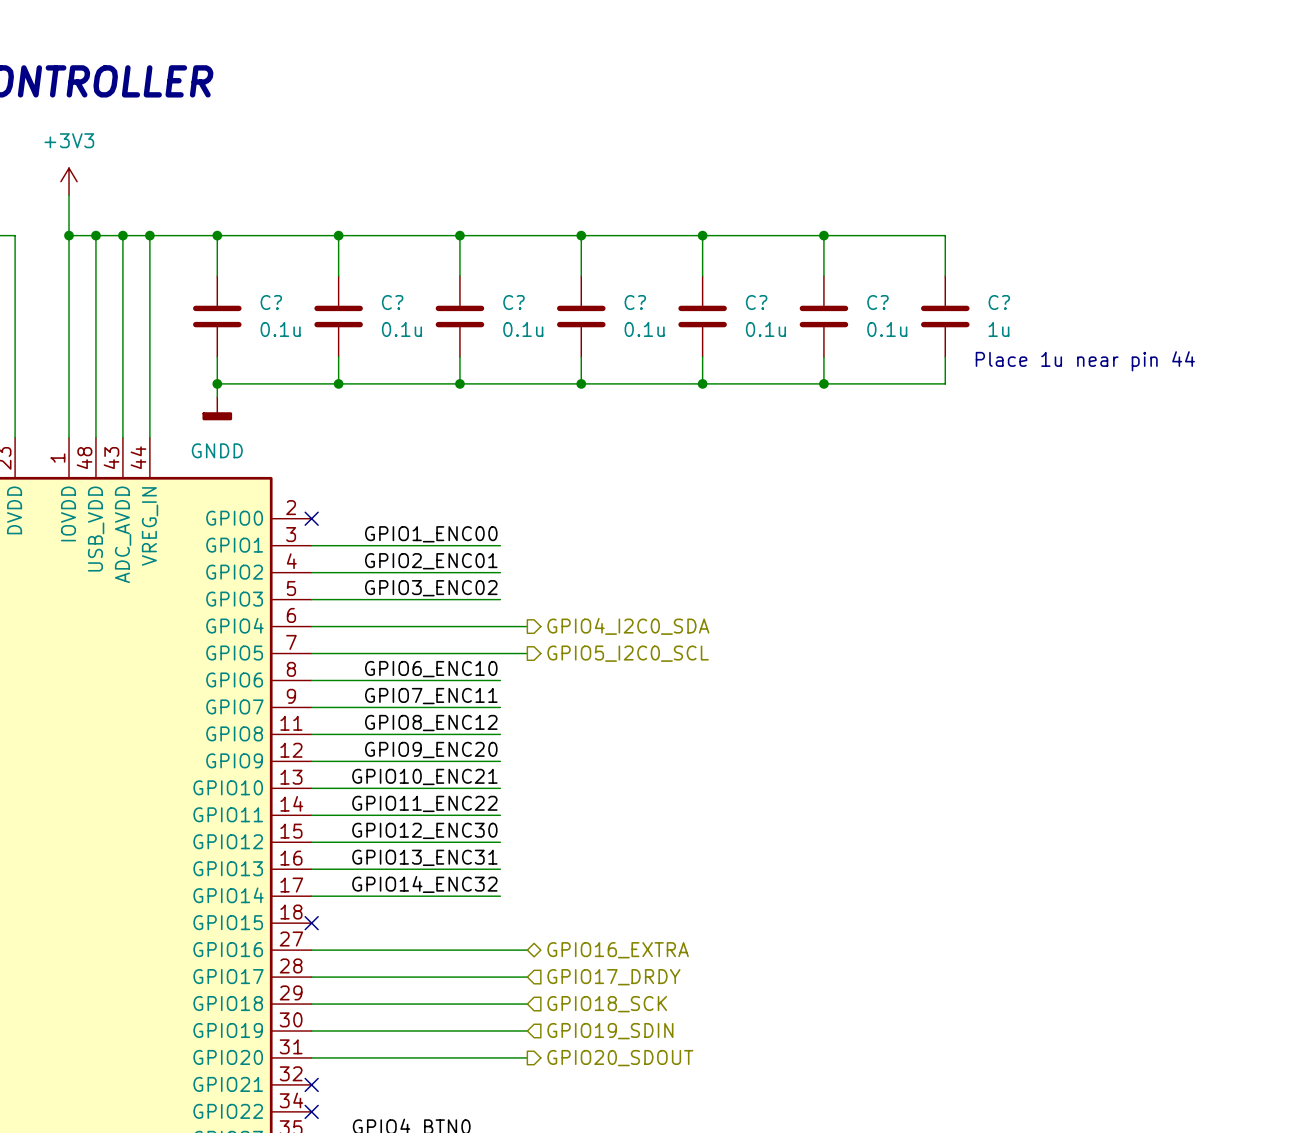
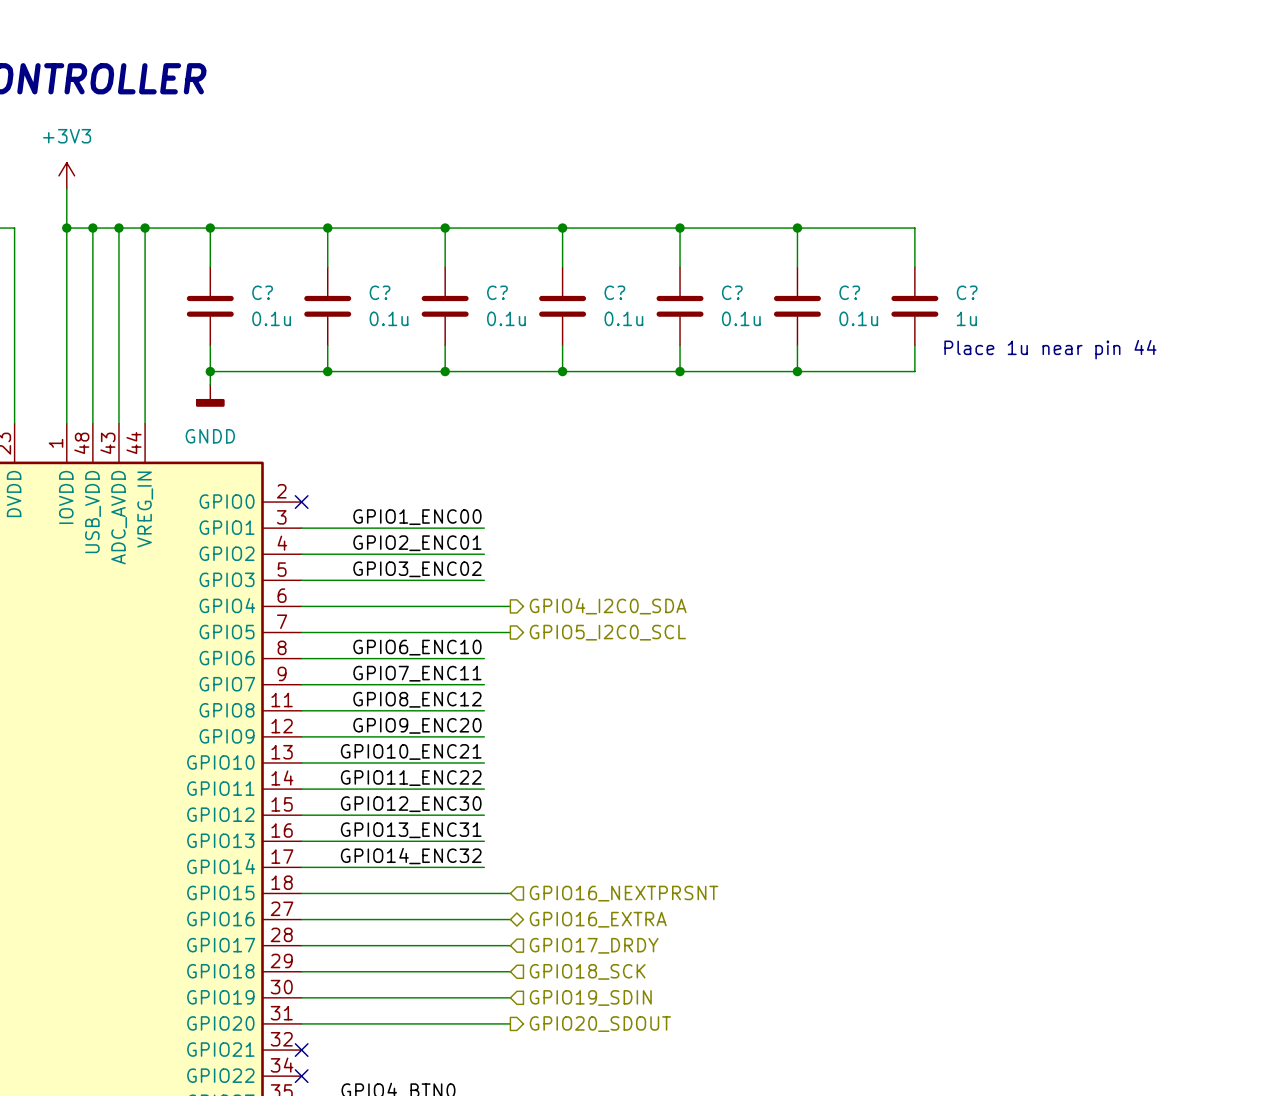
wire: none -> (301, 893) (510, 893)
no-connect mark: (311, 923) -> none
hierarchical label: none -> GPIO16_NEXTPRSNT (623, 893)

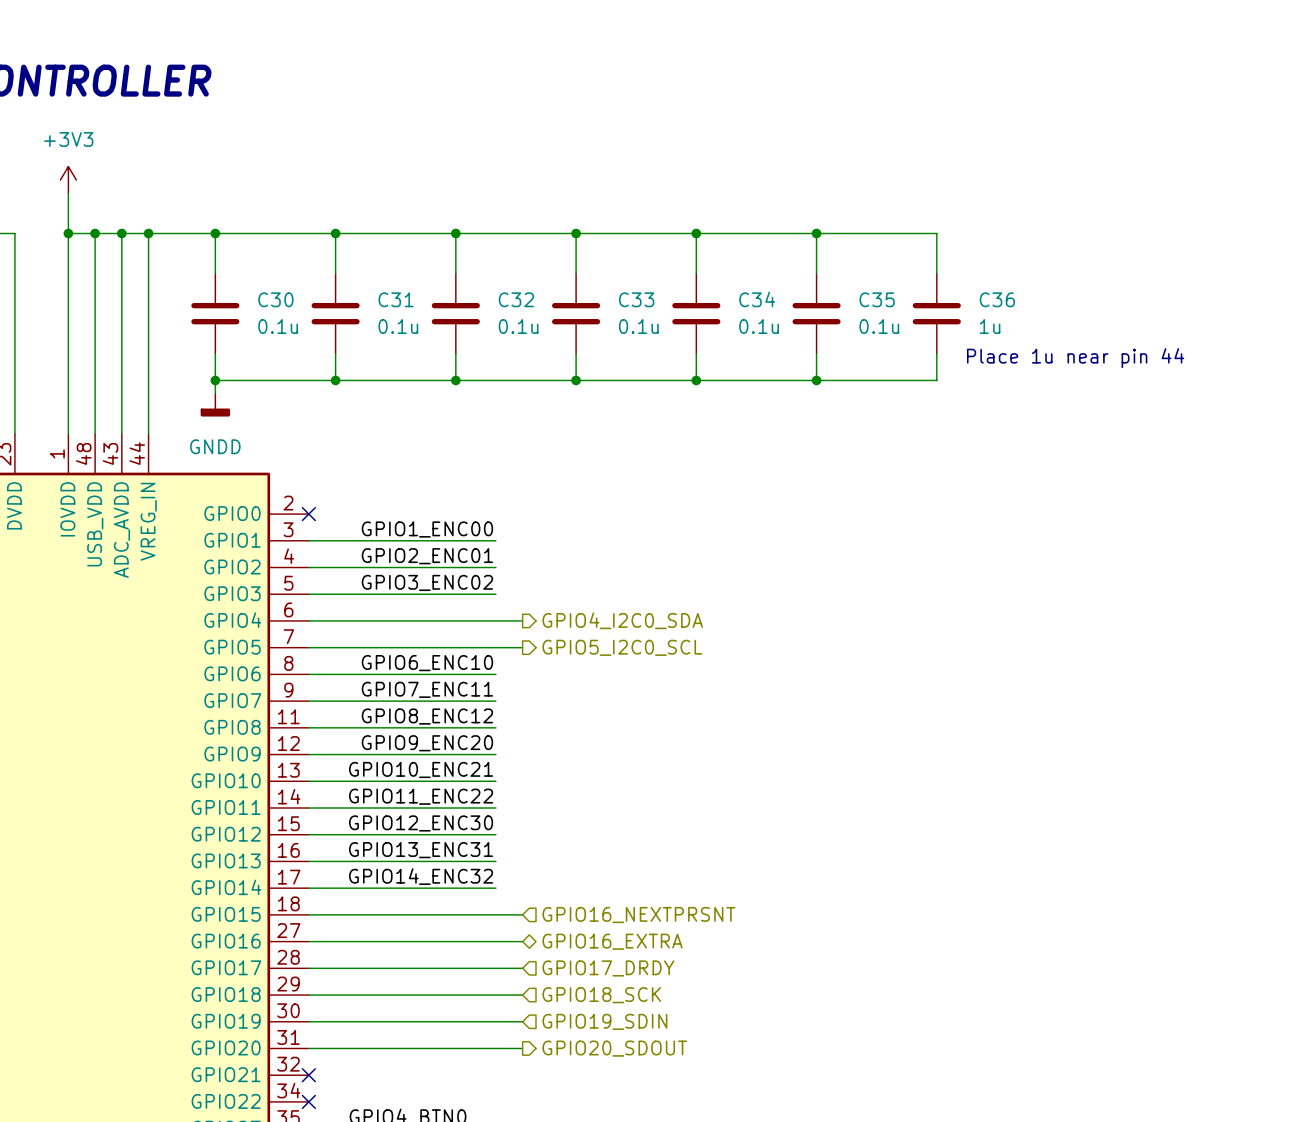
C? name: C? (262, 292) -> C30 (275, 299)
C? name: C? (380, 292) -> C31 (396, 299)
C? name: C? (497, 292) -> C32 (516, 299)
C? name: C? (614, 292) -> C33 (636, 299)
C? name: C? (732, 292) -> C34 (757, 299)
C? name: C? (849, 292) -> C35 (877, 299)
C? name: C? (967, 292) -> C36 (997, 299)

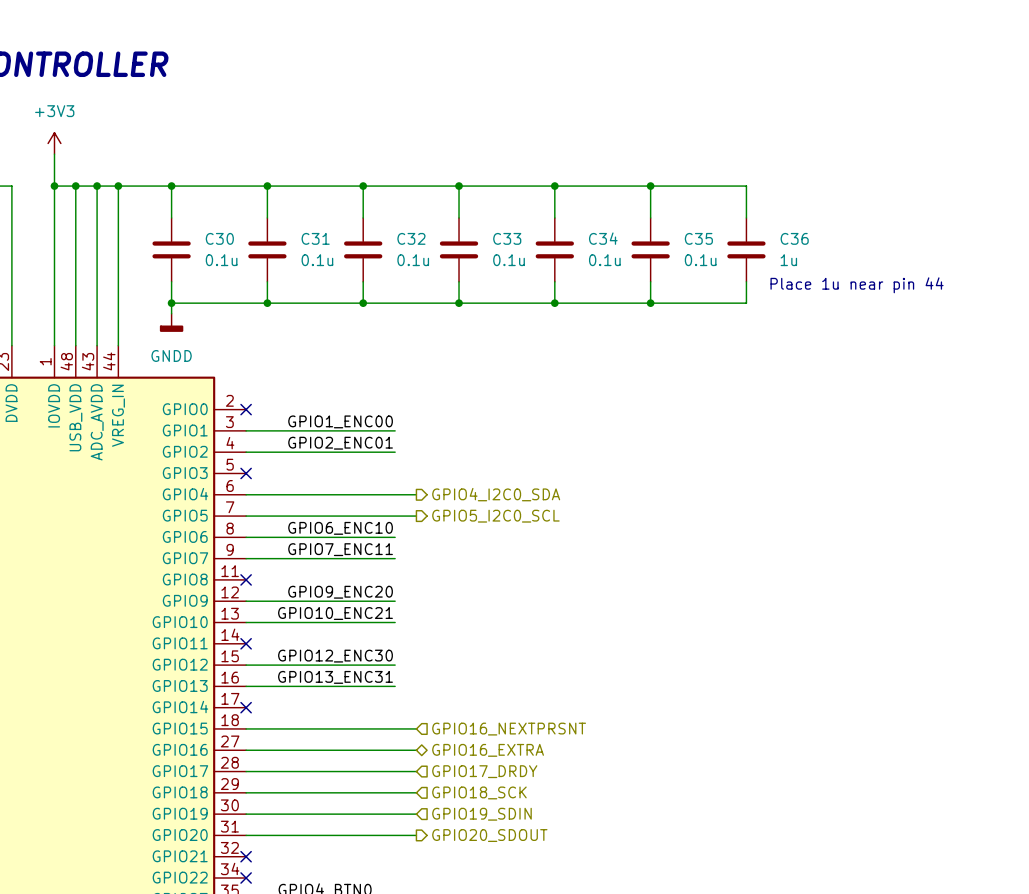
label: GPIO3_ENC02 (427, 582) -> none
wire: (308, 594) (495, 594) -> none
no-connect mark: none -> (246, 473)
label: GPIO8_ENC12 (427, 716) -> none
wire: (308, 727) (495, 727) -> none
no-connect mark: none -> (246, 579)
label: GPIO11_ENC22 (421, 796) -> none
wire: (308, 808) (495, 808) -> none
no-connect mark: none -> (246, 643)
label: GPIO14_ENC32 (421, 876) -> none
wire: (308, 888) (495, 888) -> none
no-connect mark: none -> (246, 707)

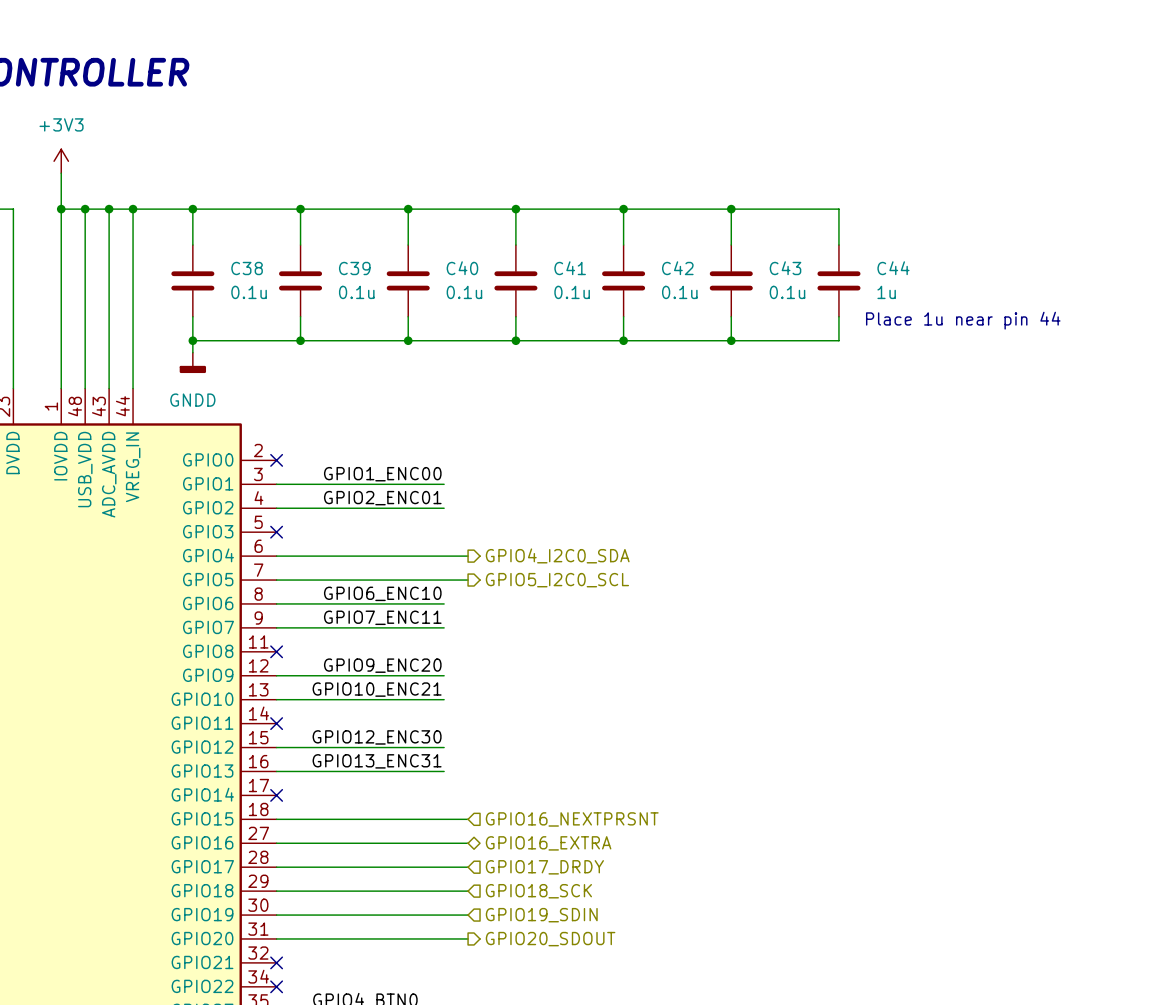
C30 name: C30 (219, 238) -> C38 (247, 268)
C31 name: C31 (315, 238) -> C39 (354, 268)
C32 name: C32 (411, 238) -> C40 (462, 268)
C33 name: C33 (507, 238) -> C41 (570, 268)
C34 name: C34 (603, 238) -> C42 (677, 268)
C35 name: C35 (698, 238) -> C43 (785, 268)
C36 name: C36 (794, 238) -> C44 (893, 268)

